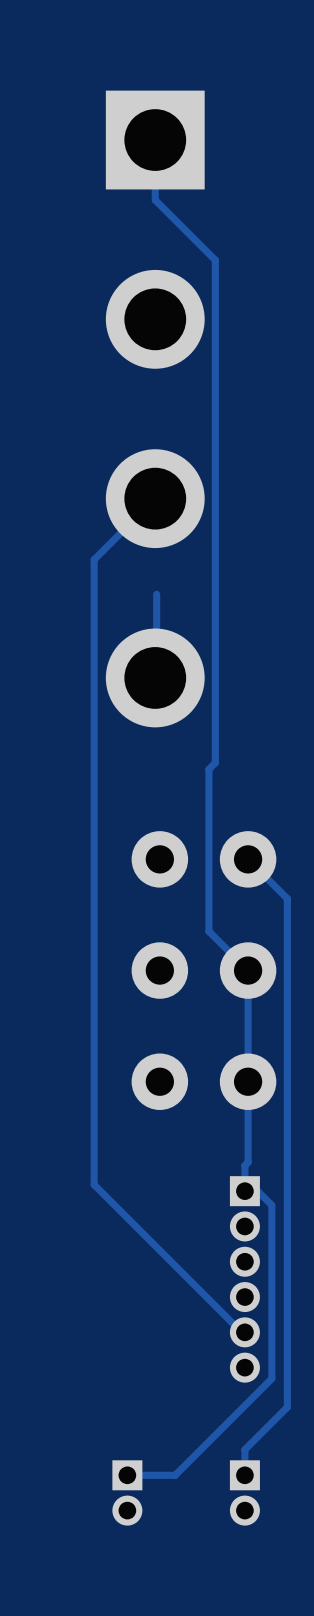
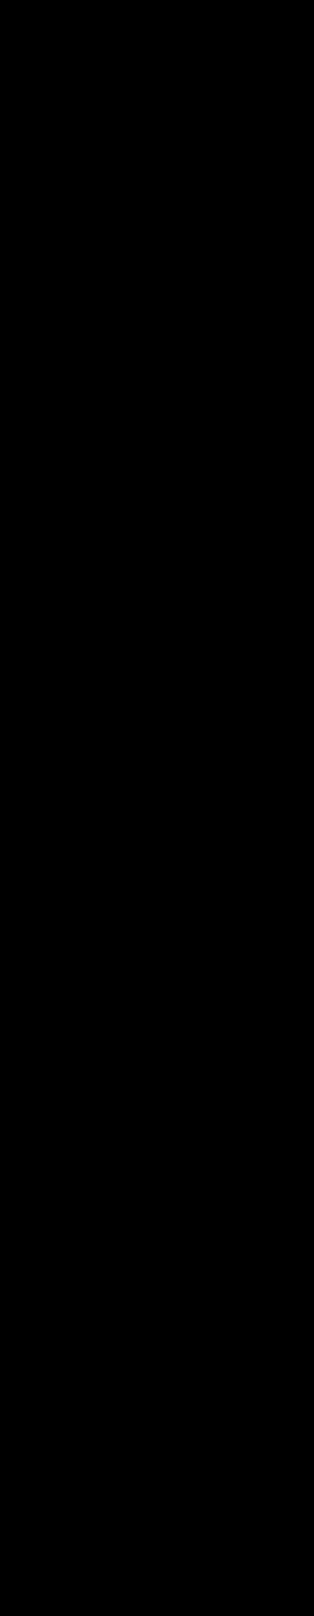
track: (155, 140) (155, 200) (215, 260) (215, 762) (208, 769) (208, 931) (248, 970) (248, 1162) (244, 1165) (244, 1191) -> none
part: (155, 408) -> none
track: (155, 498) (94, 559) (94, 1184) (241, 1332) (244, 1332) -> none
track: (156, 594) (155, 677) -> none
part: (203, 859) -> none
track: (248, 859) (287, 898) (287, 1407) (244, 1449) (244, 1475) -> none
part: (203, 970) -> none
part: (203, 1081) -> none
track: (244, 1178) (271, 1205) (271, 1378) (175, 1475) (127, 1475) -> none
part: (244, 1279) -> none
part: (127, 1492) -> none
part: (244, 1492) -> none

